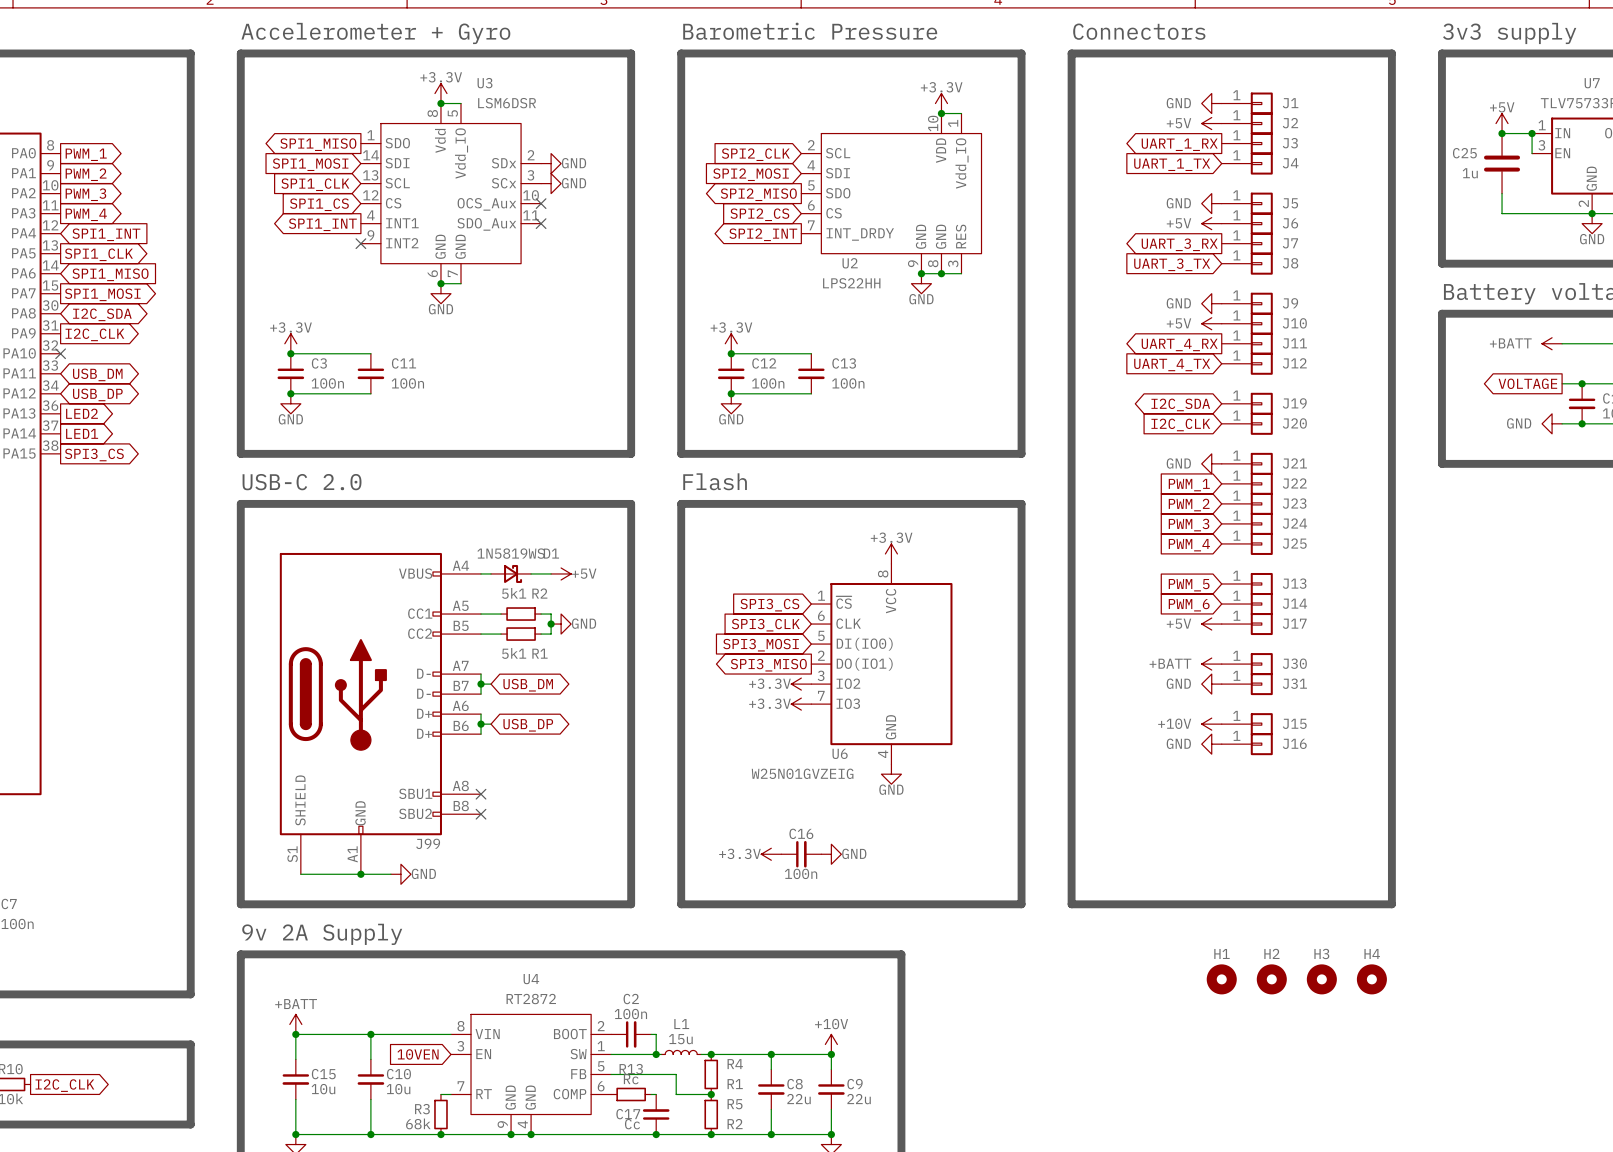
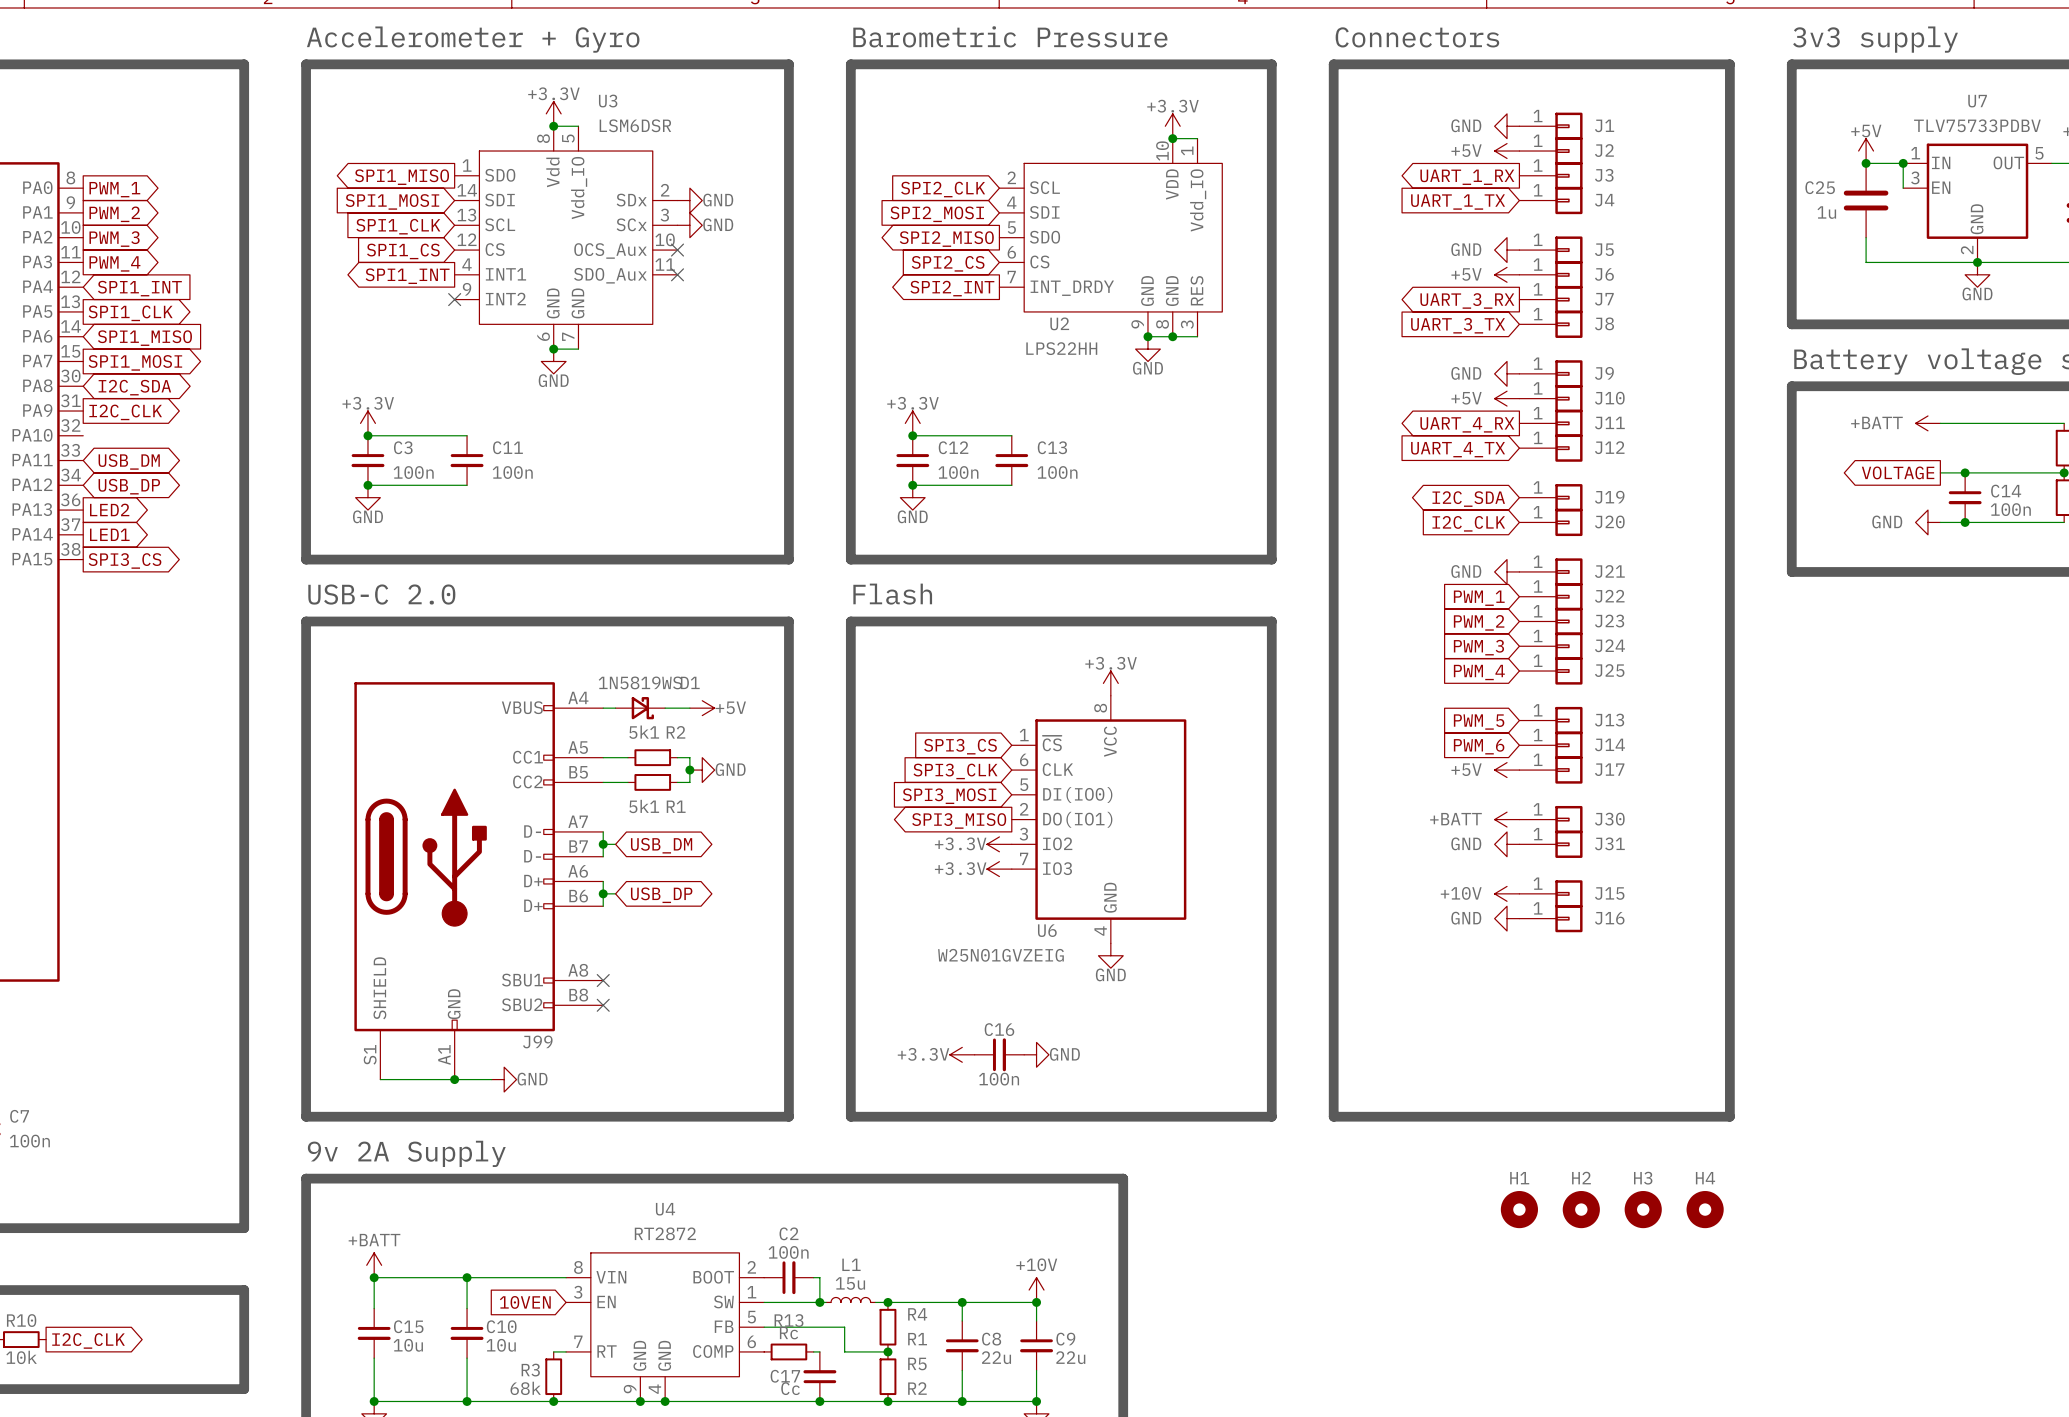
no-connect mark: (60, 353) -> none

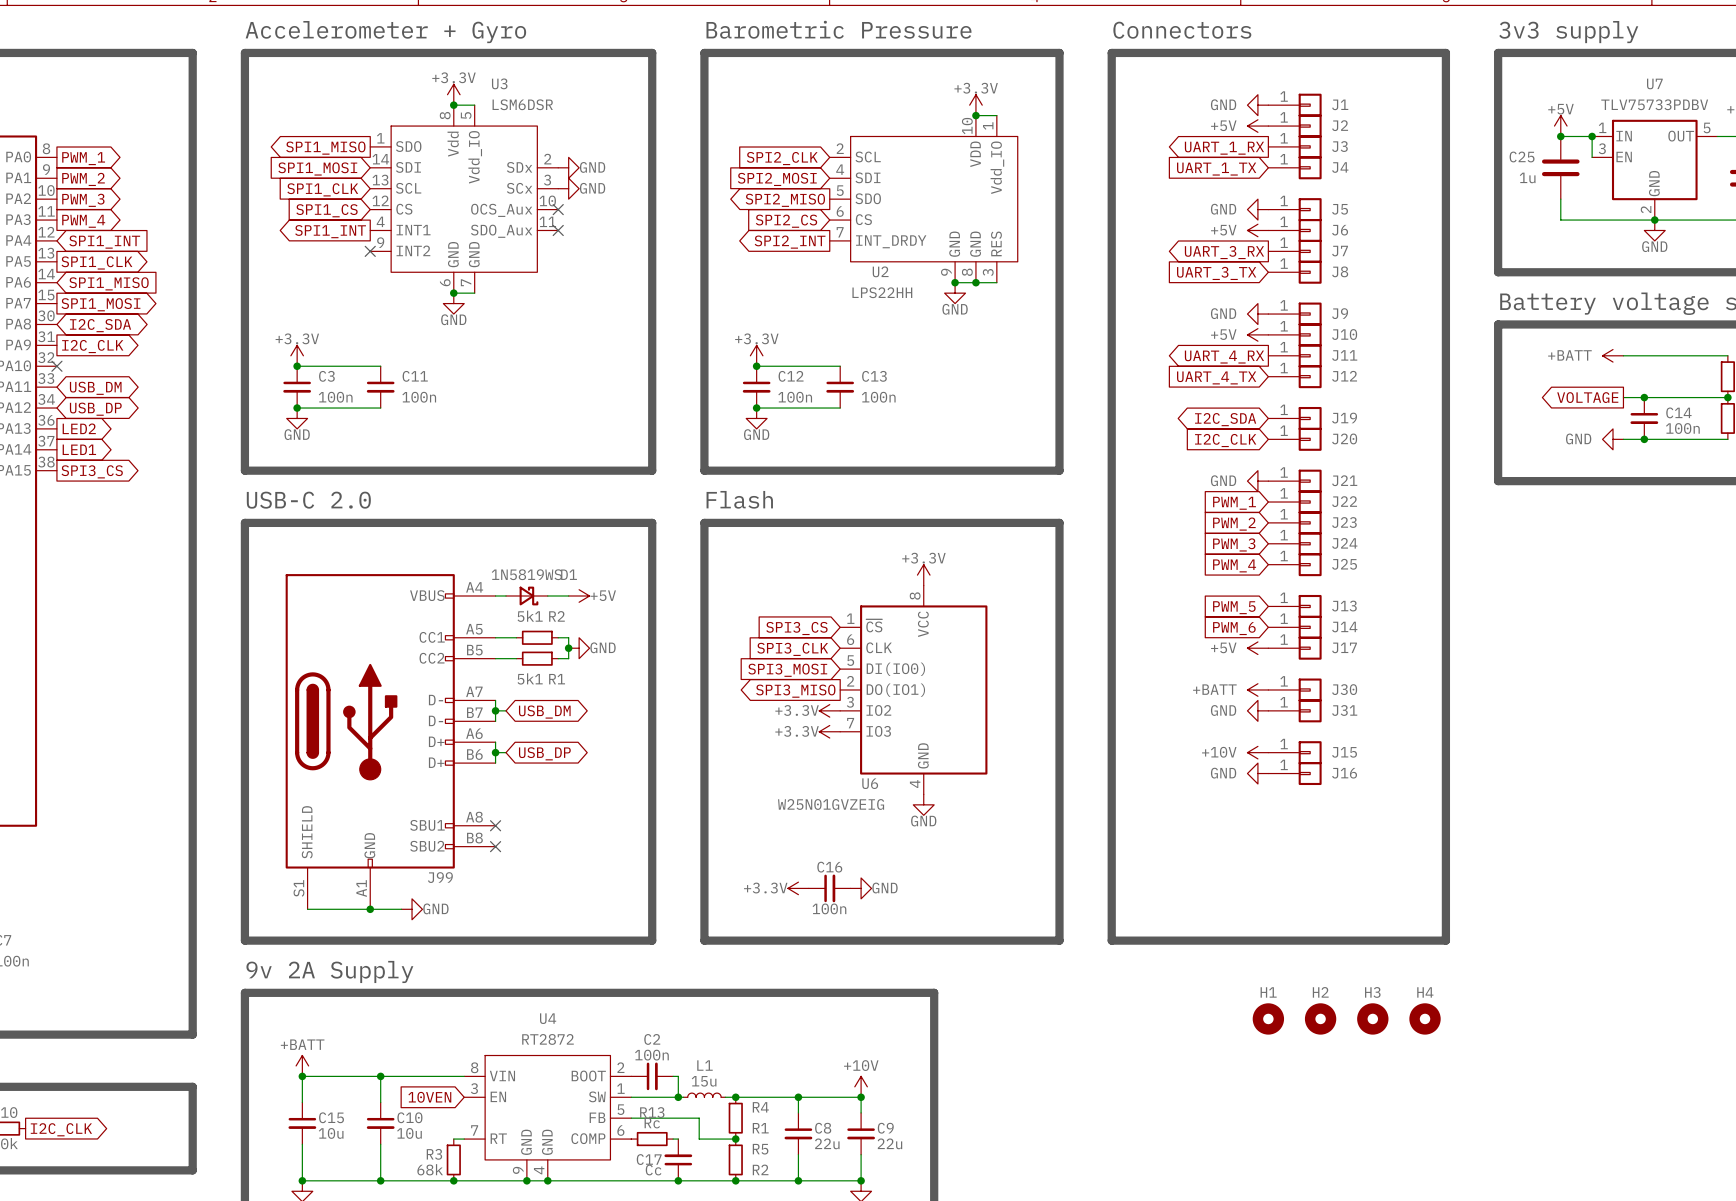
no-connect mark: none -> (56, 366)

